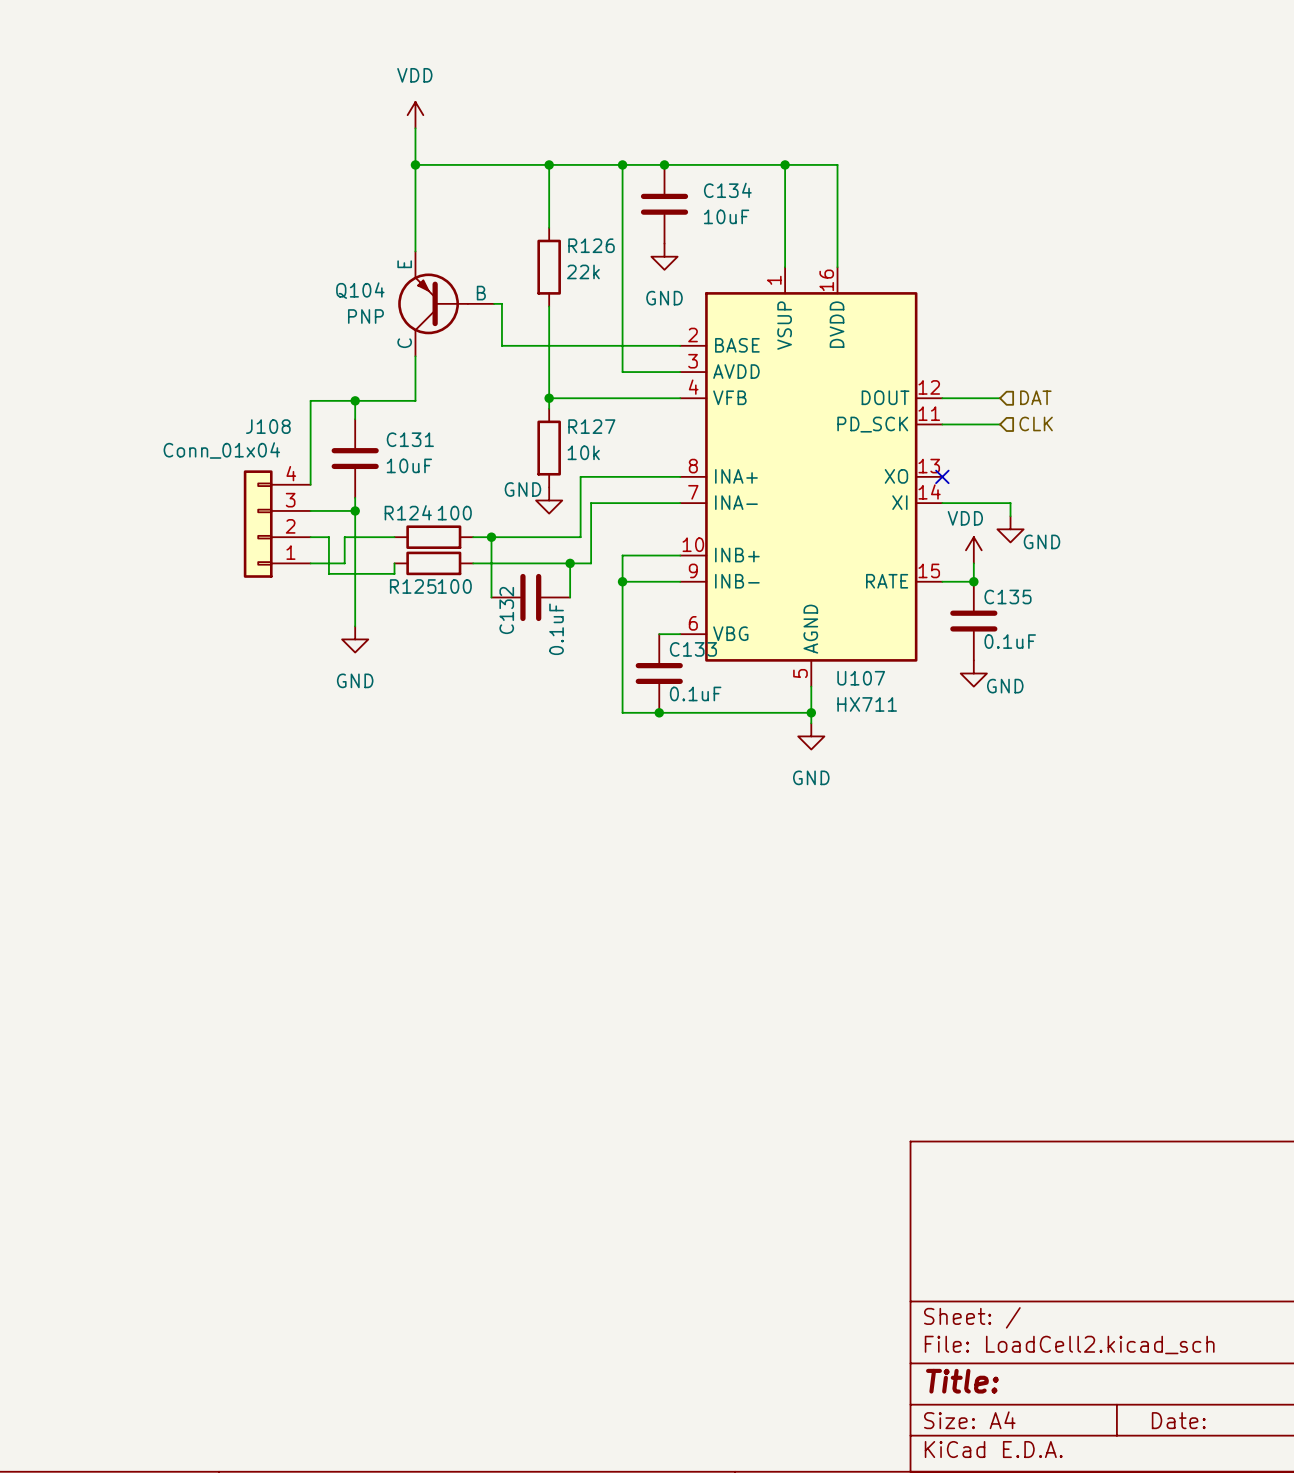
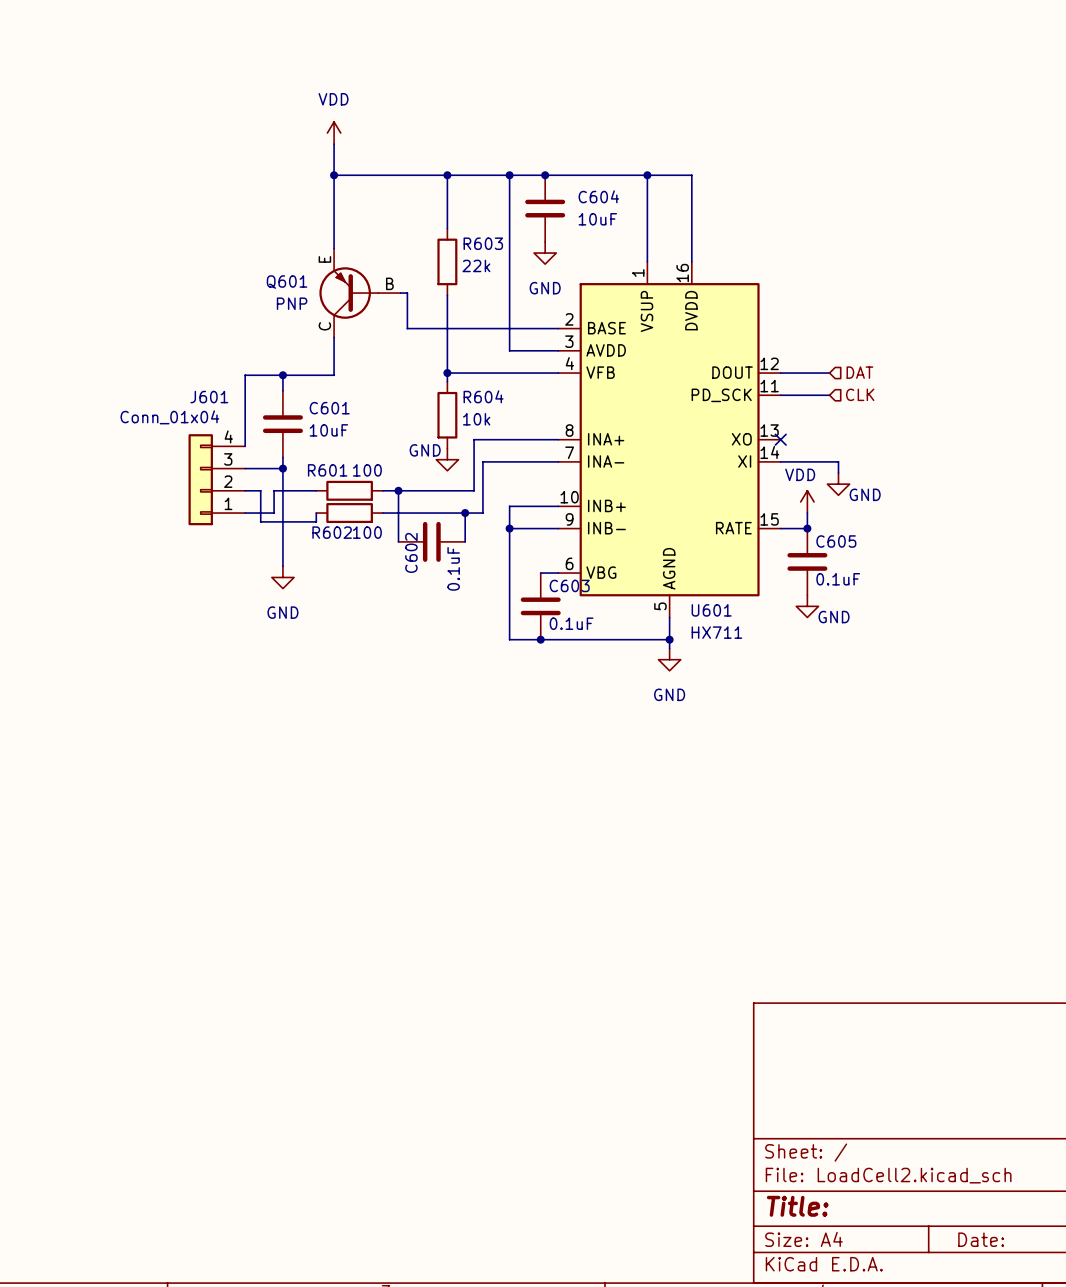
C134 name: C134 (727, 190) -> C604 (598, 196)
R126 name: R126 (591, 245) -> R603 (483, 243)
Q104 name: Q104 (360, 290) -> Q601 (287, 282)
J108 name: J108 (268, 426) -> J601 (209, 397)
R127 name: R127 (591, 426) -> R604 (483, 396)
C131 name: C131 (410, 439) -> C601 (329, 408)
R124 name: R124 (408, 512) -> R601 (327, 470)
R125 name: R125 (413, 586) -> R602 (332, 532)
C135 name: C135 (1008, 596) -> C605 (836, 541)
C132 name: C132 (506, 610) -> C602 (411, 552)
C133 name: C133 (693, 649) -> C603 (569, 585)
U107 name: U107 (861, 678) -> U601 (711, 610)

